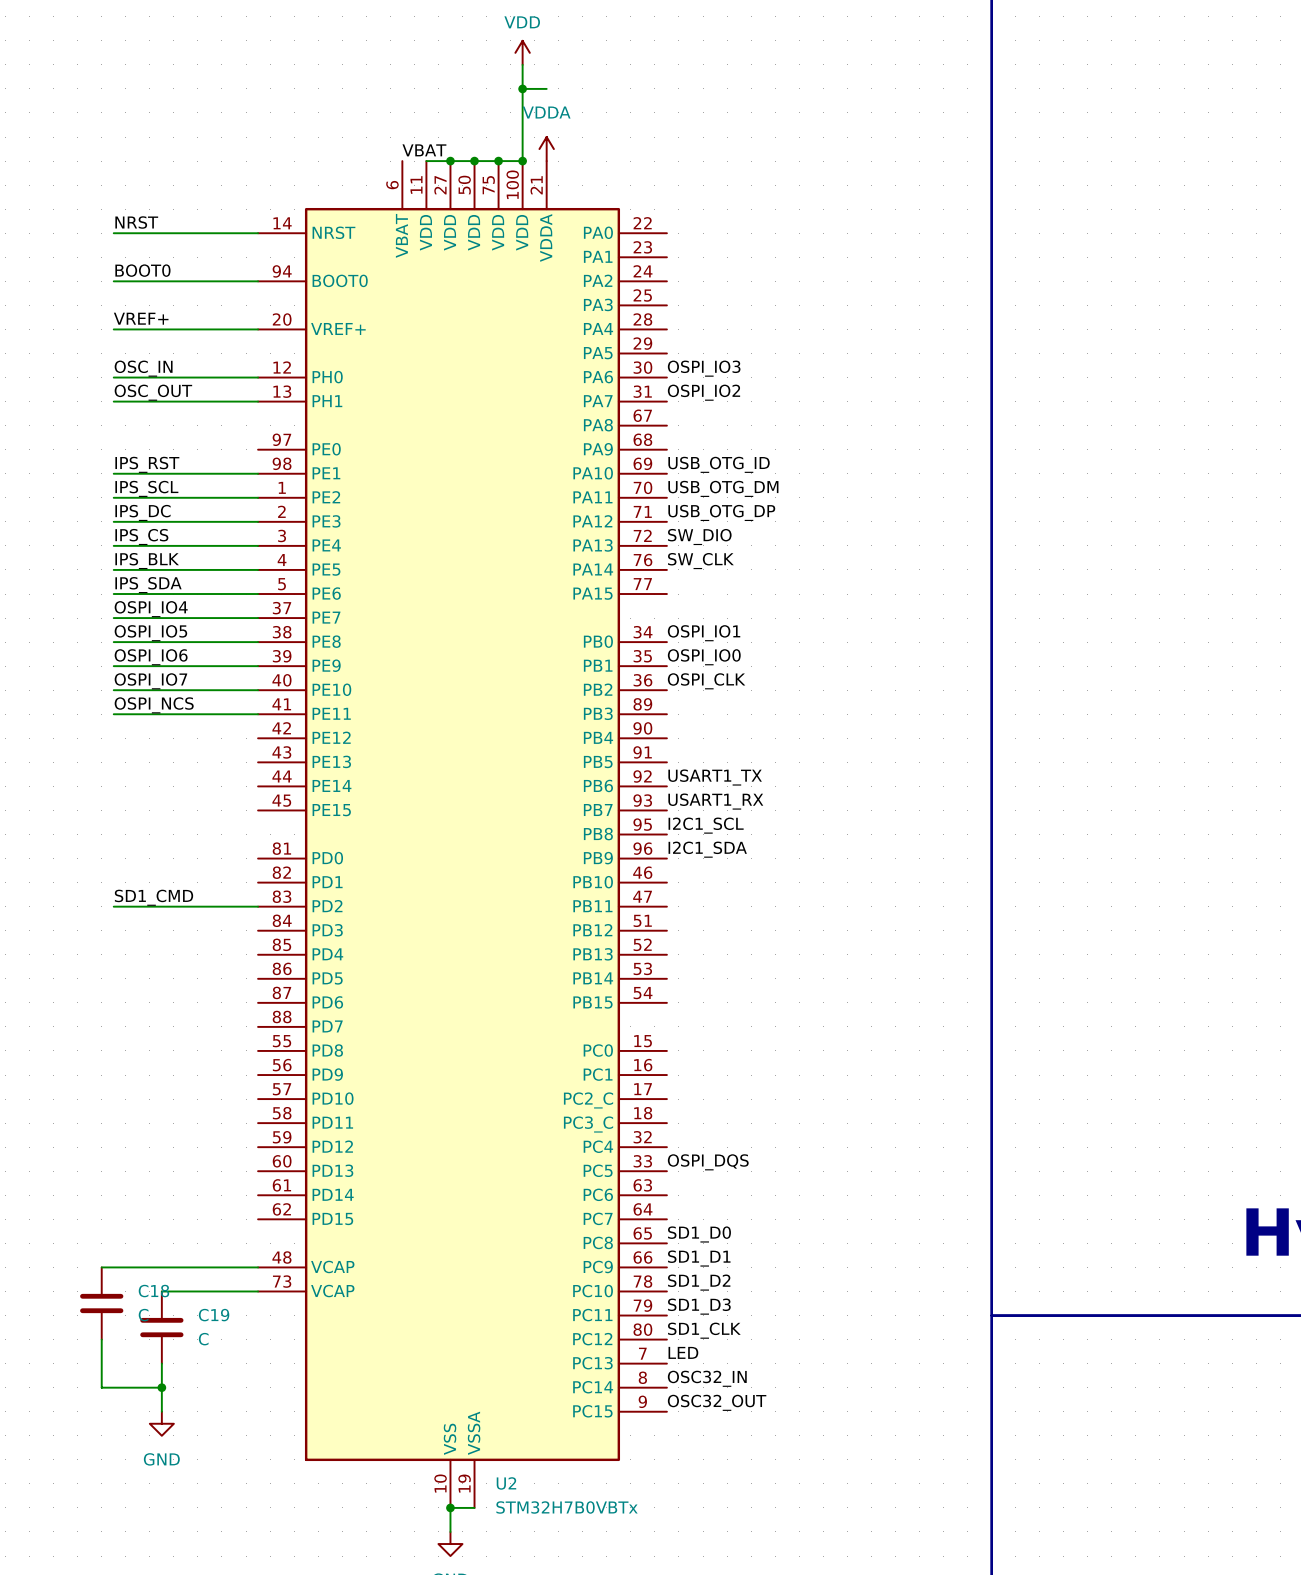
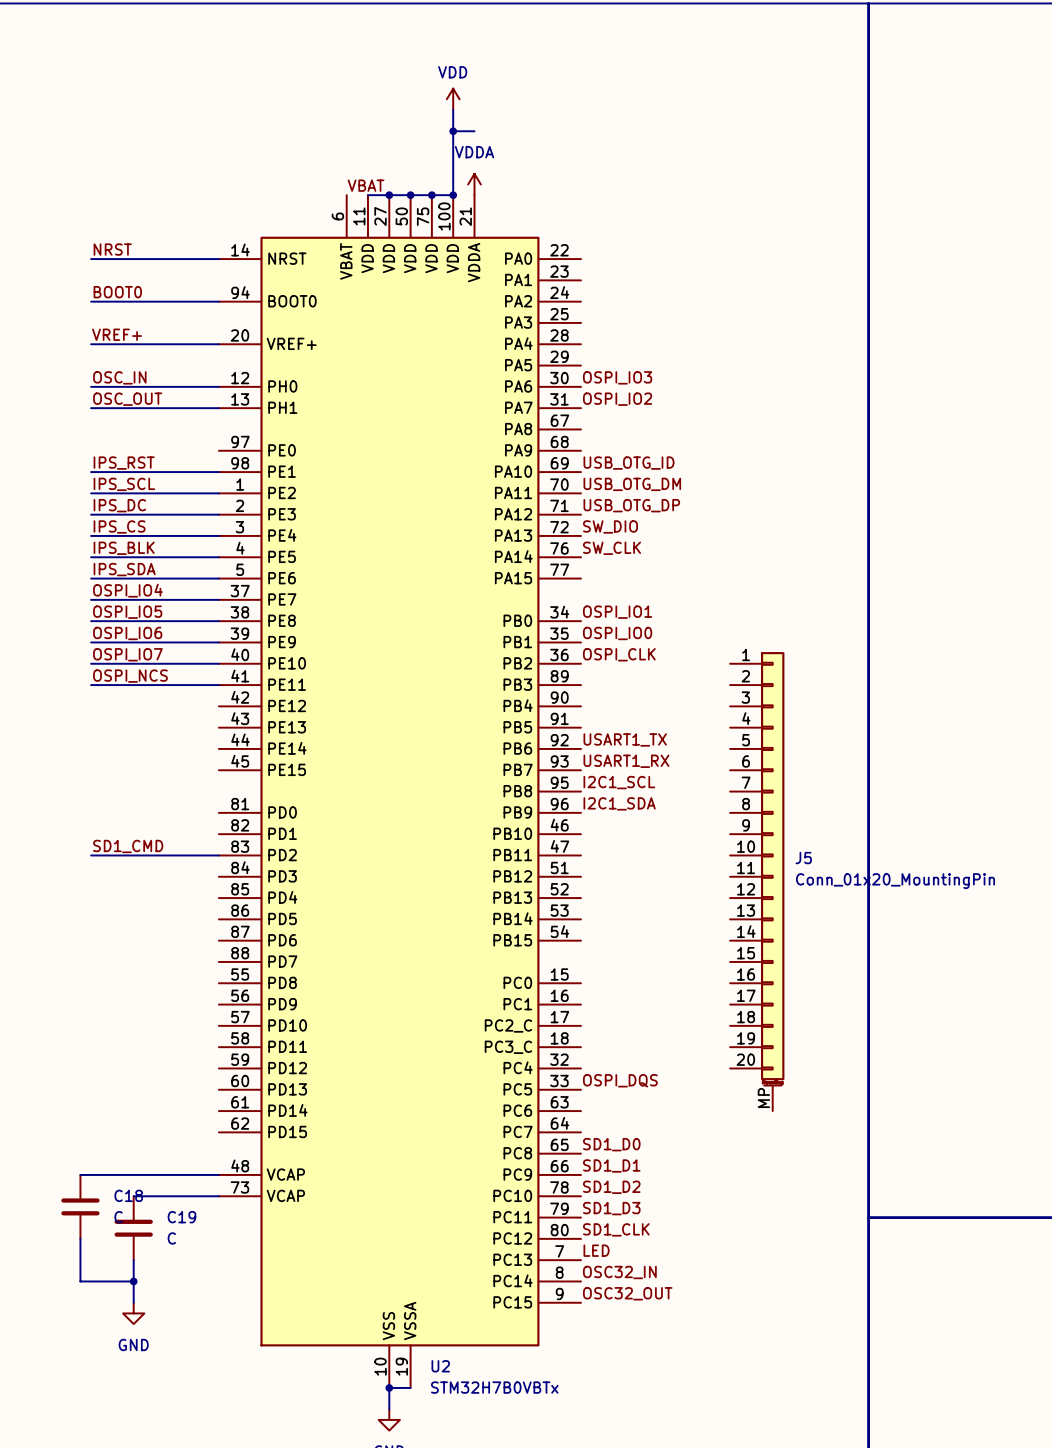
J5: none -> Conn_01x20_MountingPin (757, 881)

